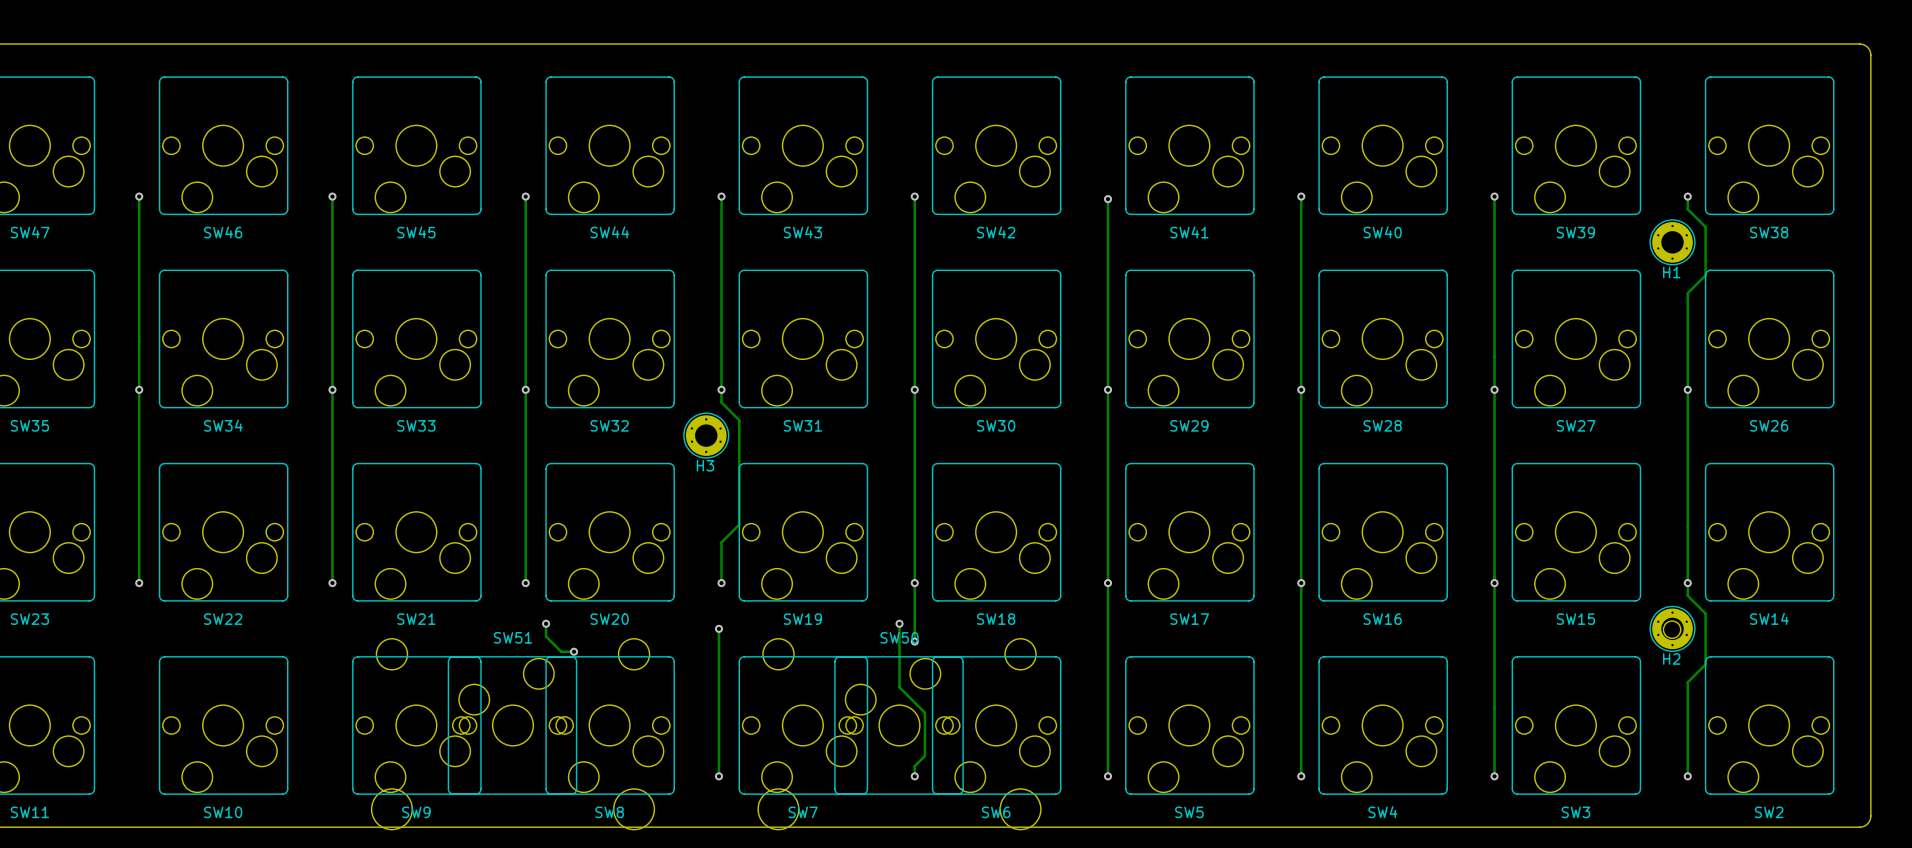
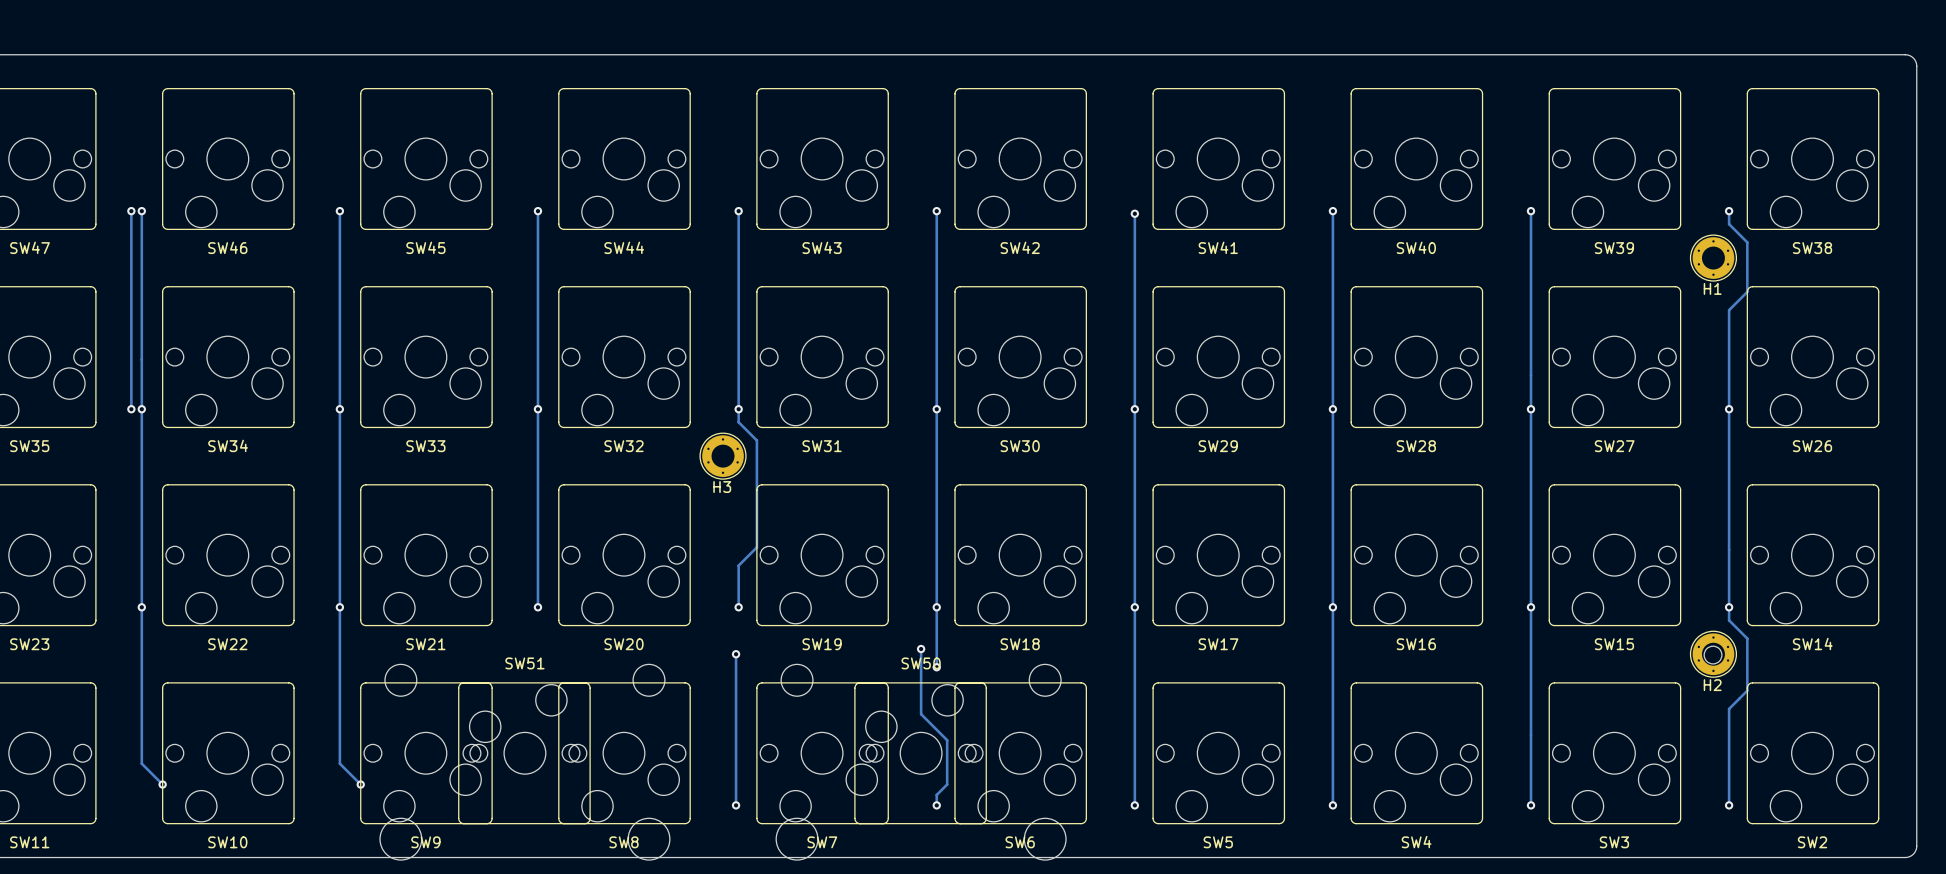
track: none -> (131, 211) (131, 409)
via: none -> (131, 211)
via: none -> (131, 409)
track: none -> (141, 607) (141, 763) (162, 784)
track: none -> (339, 607) (339, 763) (360, 784)
track: (546, 623) (546, 636) (561, 651) (574, 651) -> none
via: (546, 623) -> none
via: (574, 651) -> none
via: none -> (162, 784)
via: none -> (360, 784)

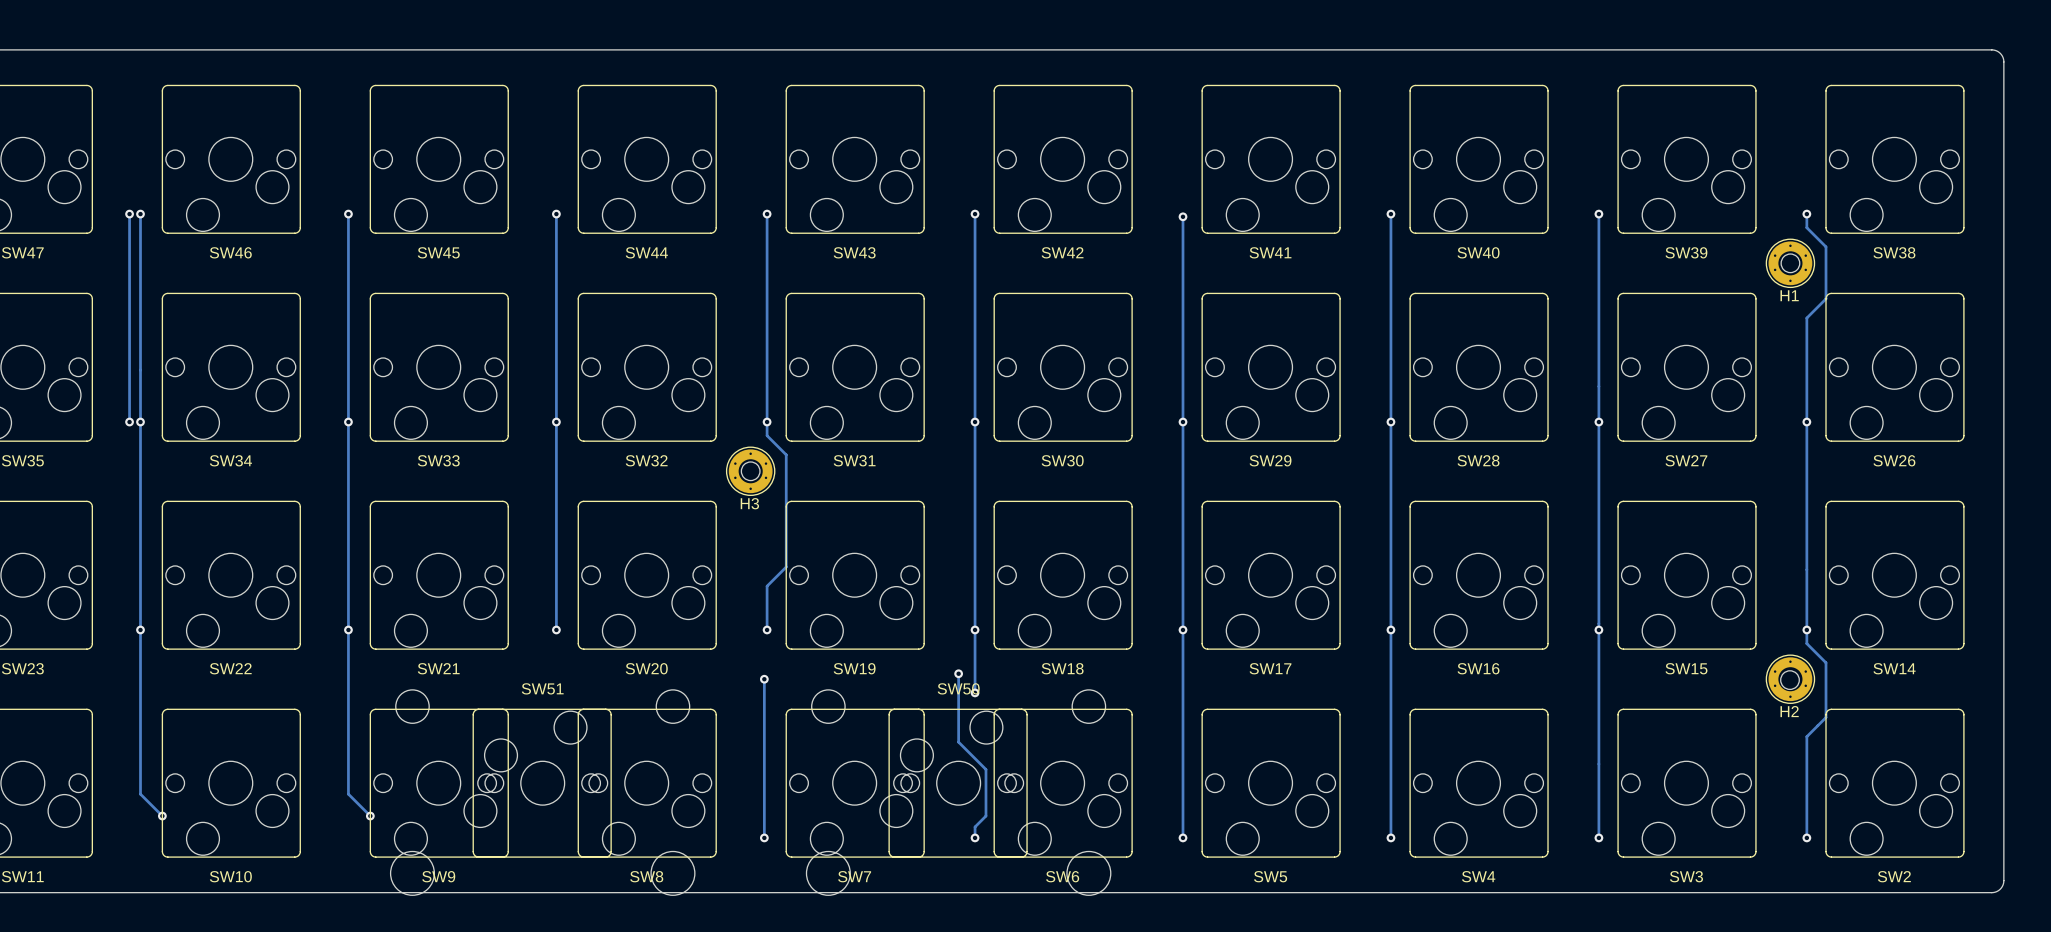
round board edge: none -> [1780, 253, 1801, 273]
round board edge: none -> [741, 461, 761, 481]

